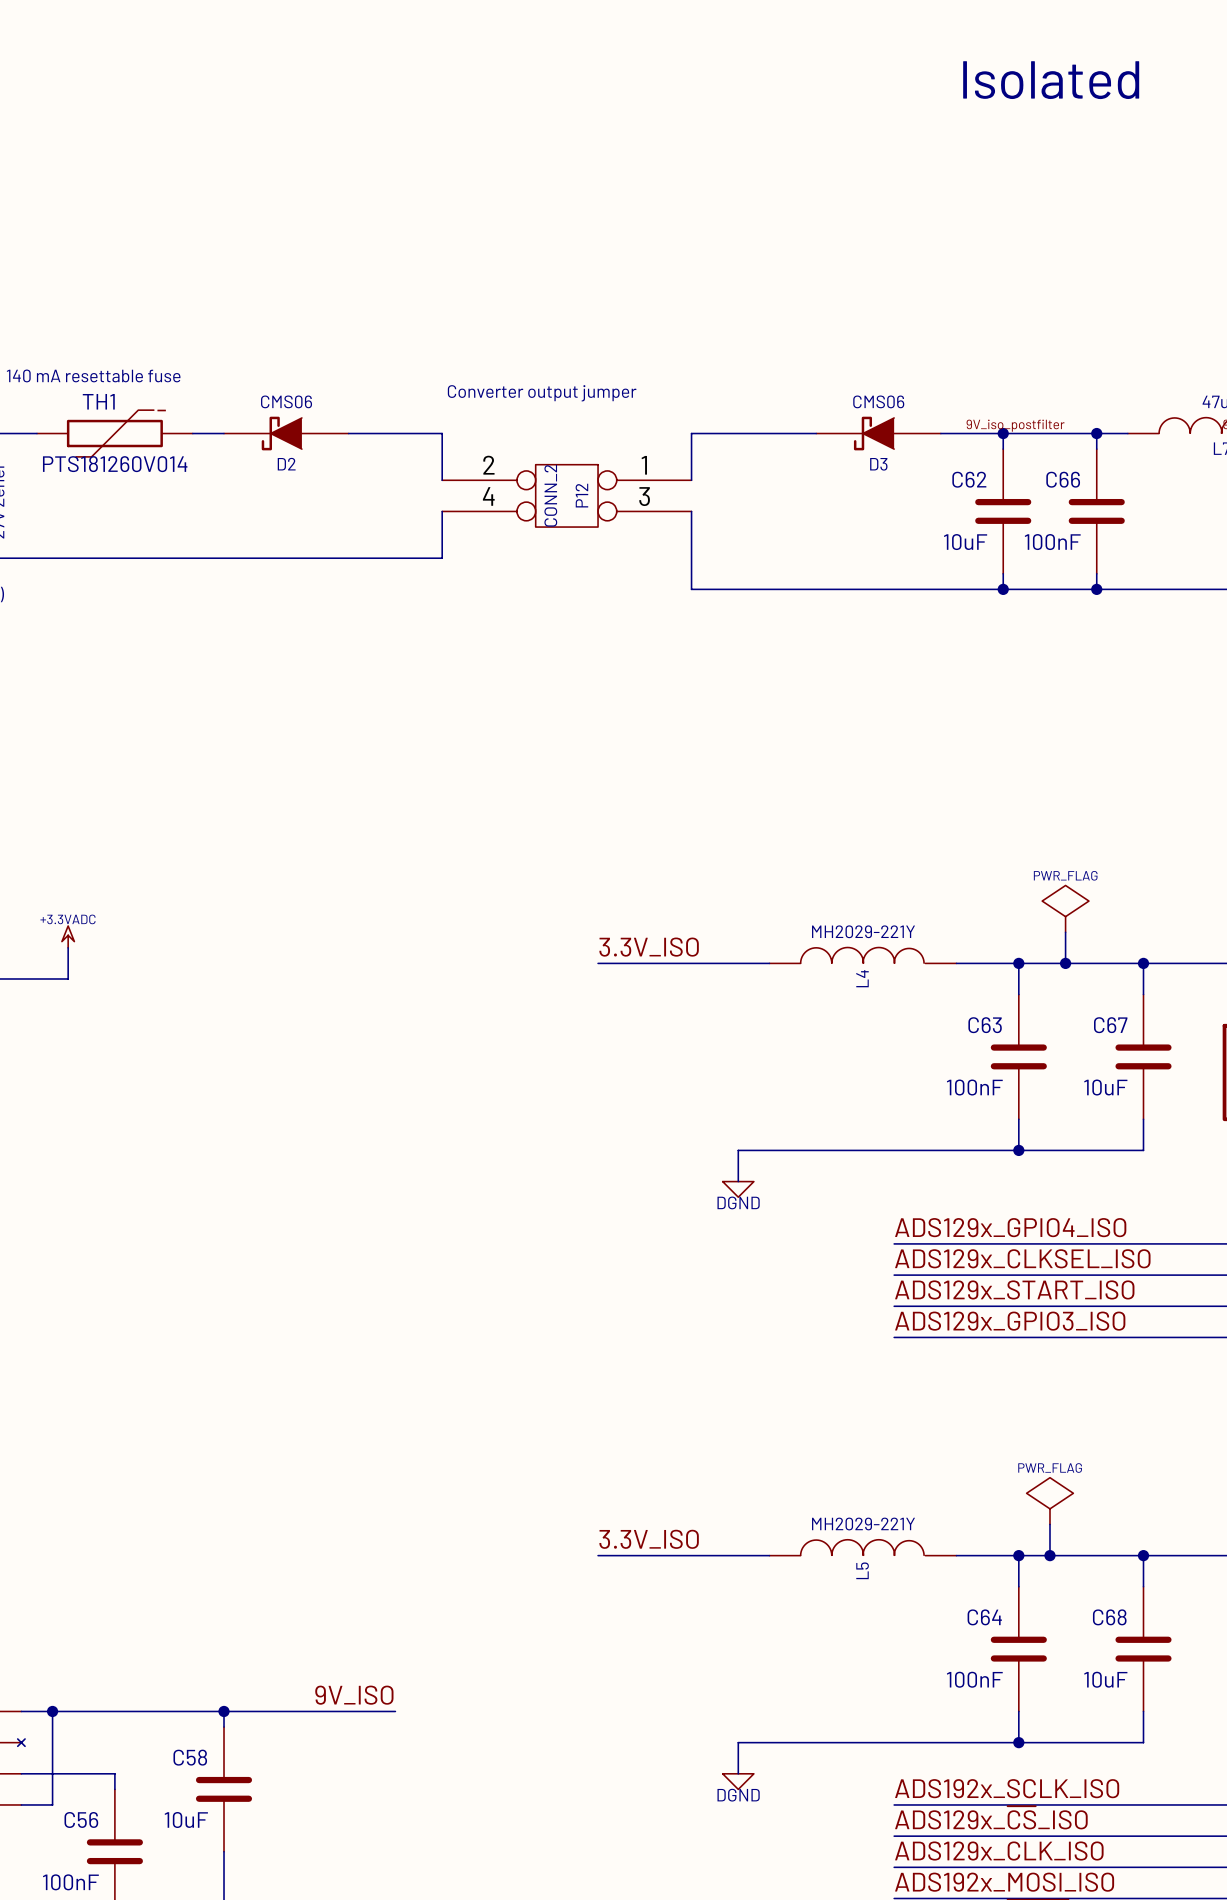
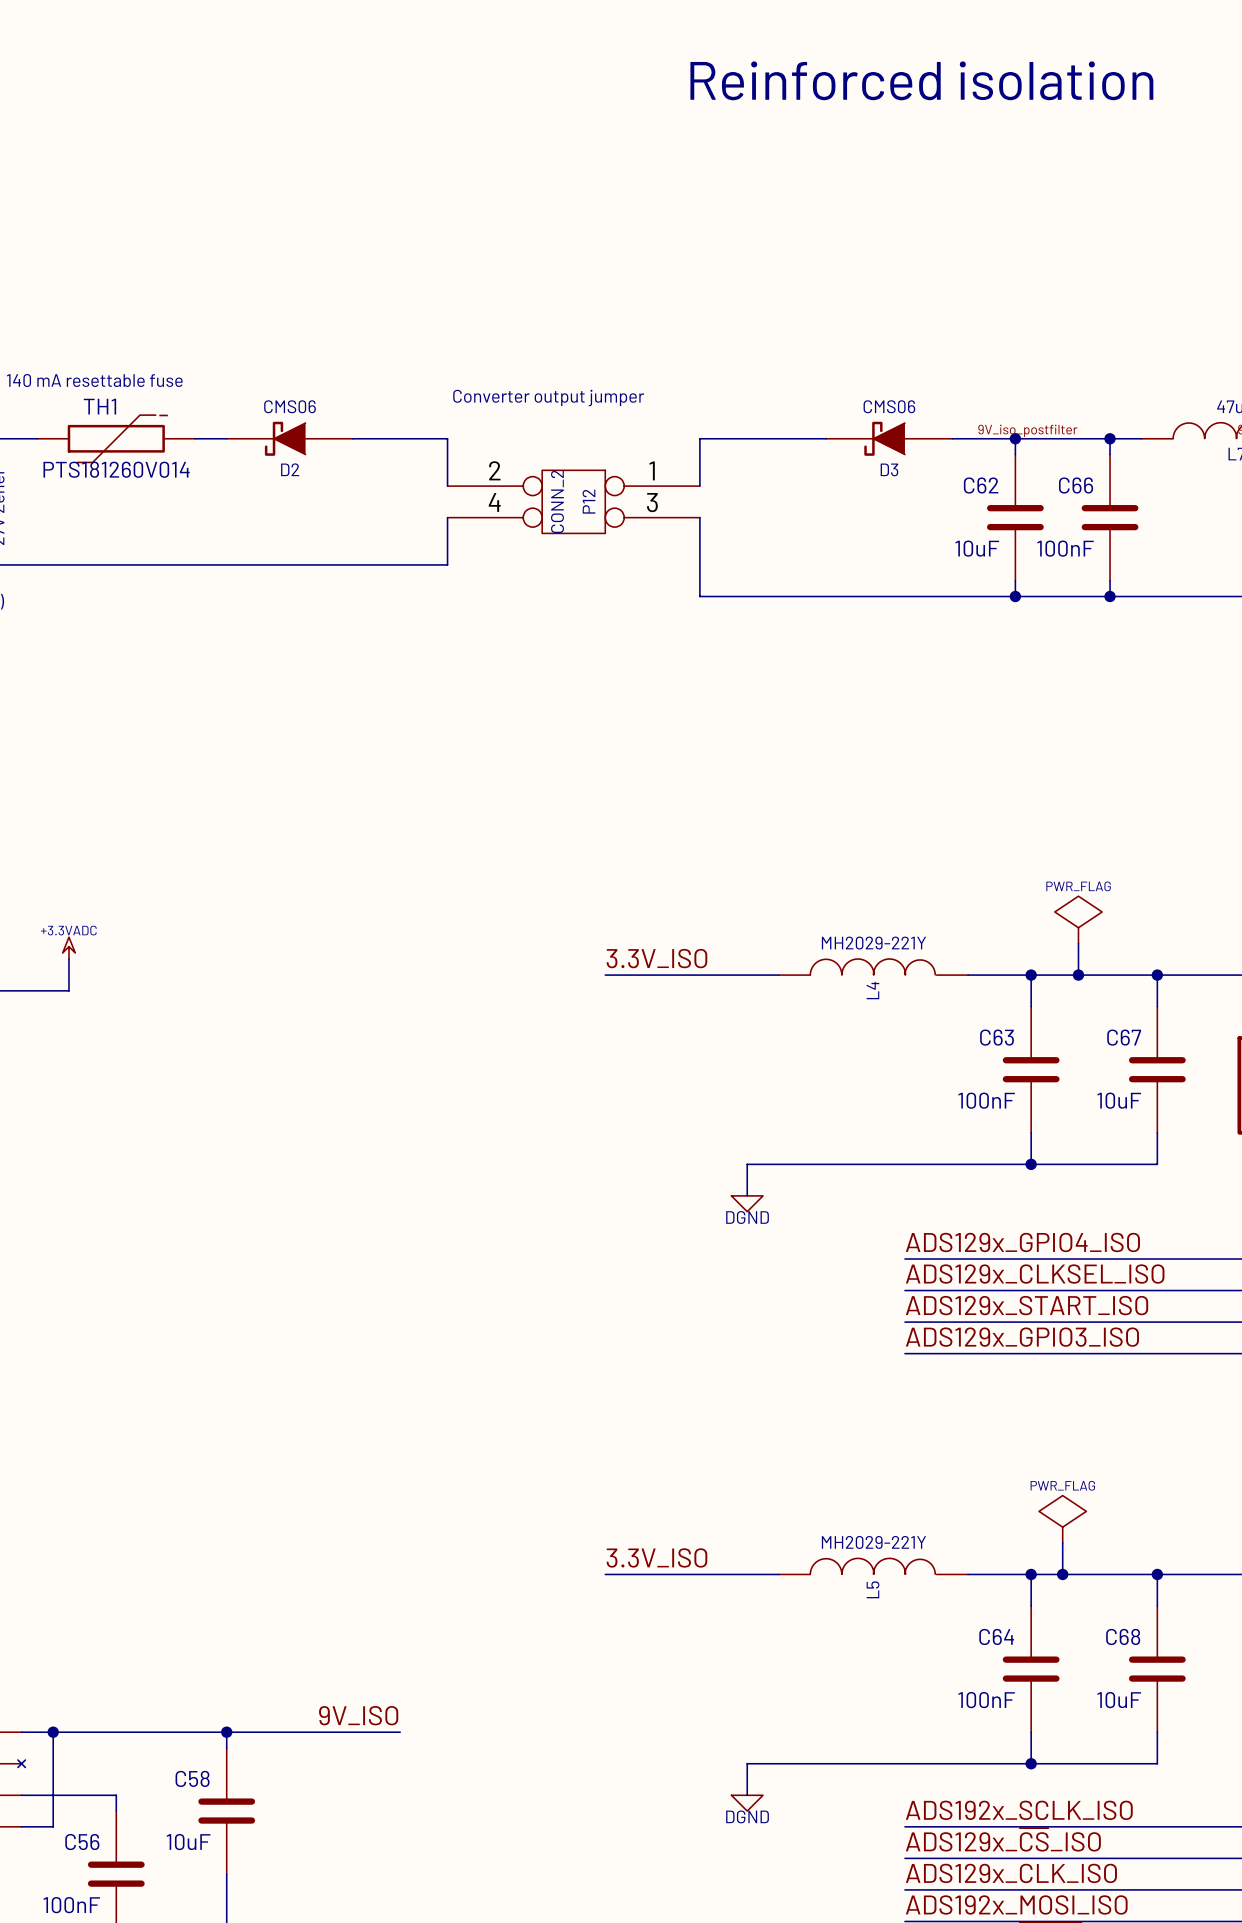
text: Isolated (1051, 80) -> Reinforced isolation (921, 80)

